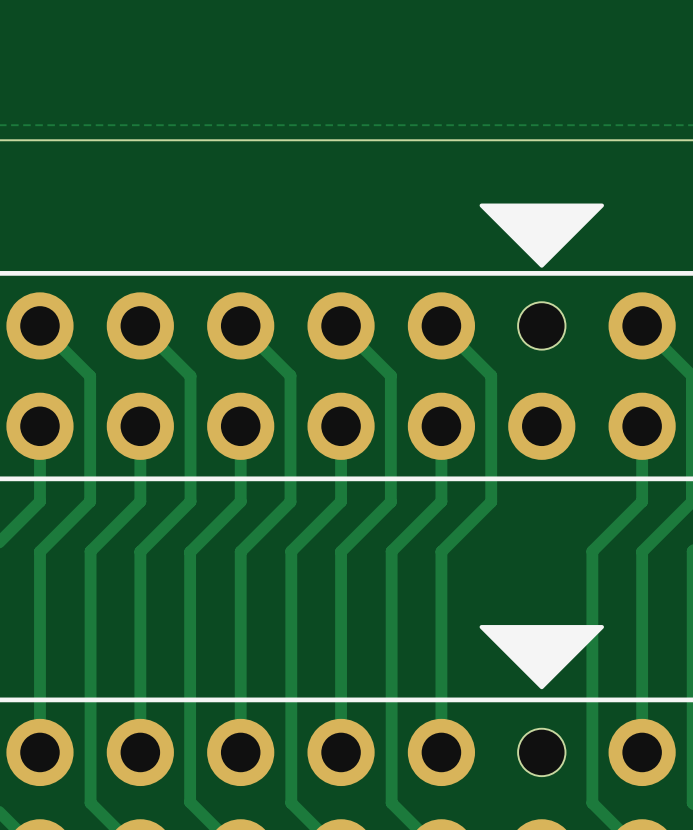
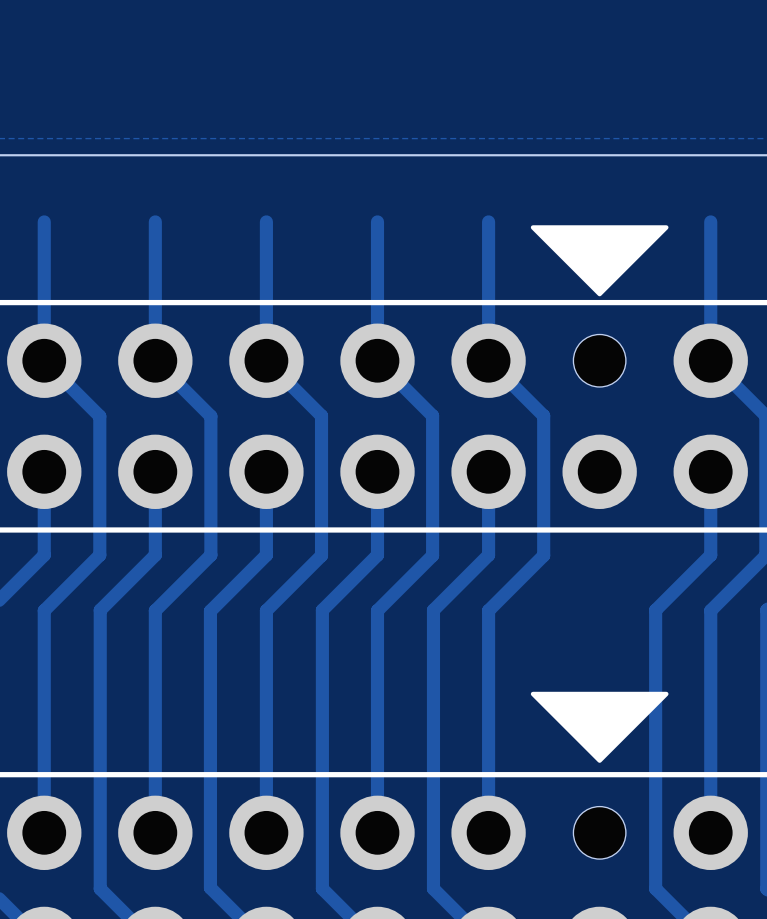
track: none -> (44, 221) (44, 360)
track: none -> (155, 221) (155, 360)
track: none -> (266, 221) (266, 360)
track: none -> (377, 221) (377, 360)
track: none -> (488, 221) (488, 360)
track: none -> (710, 221) (710, 360)

